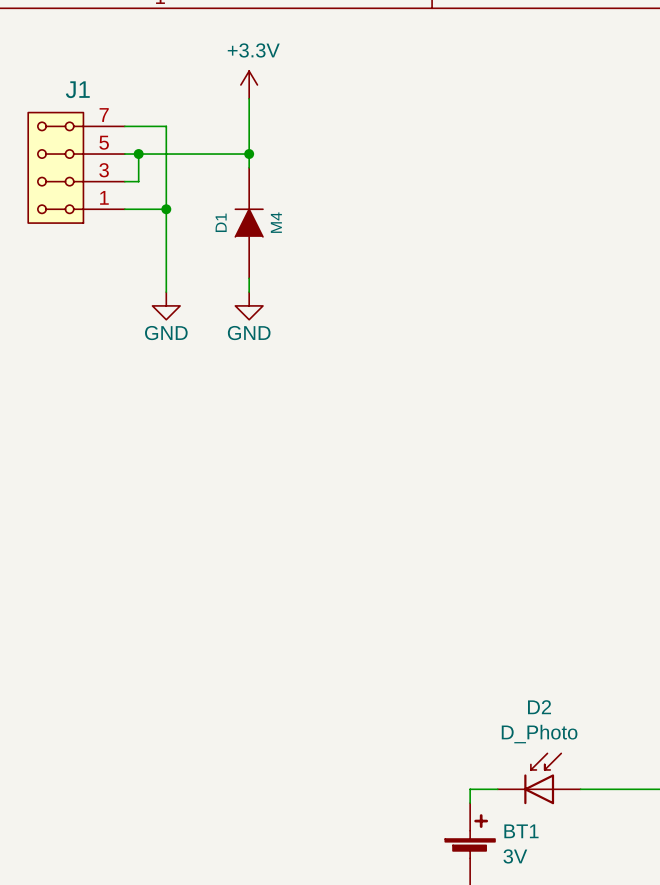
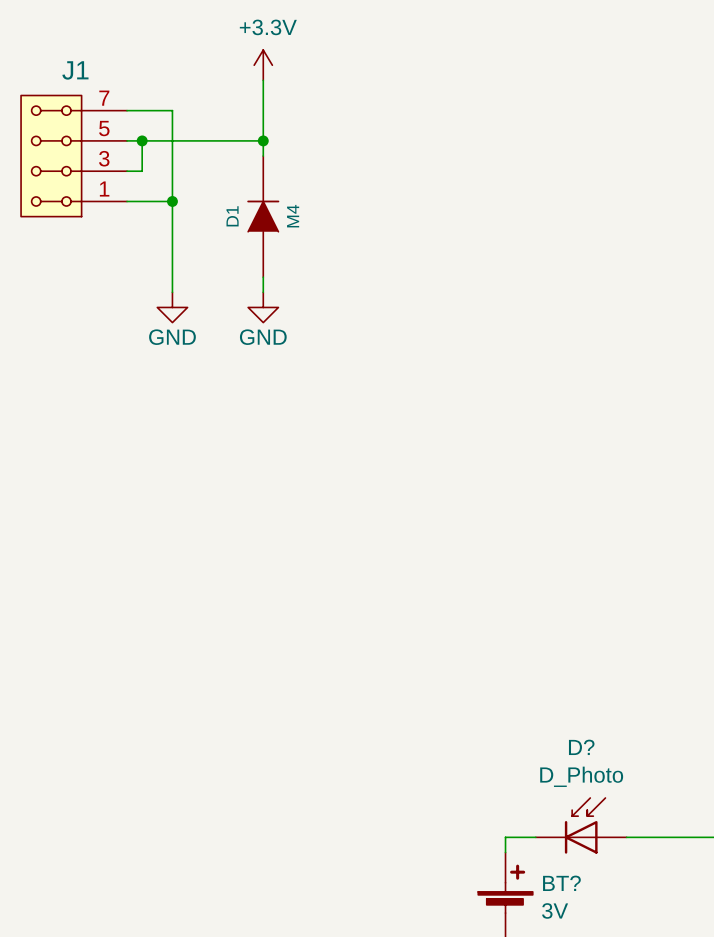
D2 name: D2 (539, 707) -> D? (581, 747)
BT1 name: BT1 (521, 831) -> BT? (561, 883)

